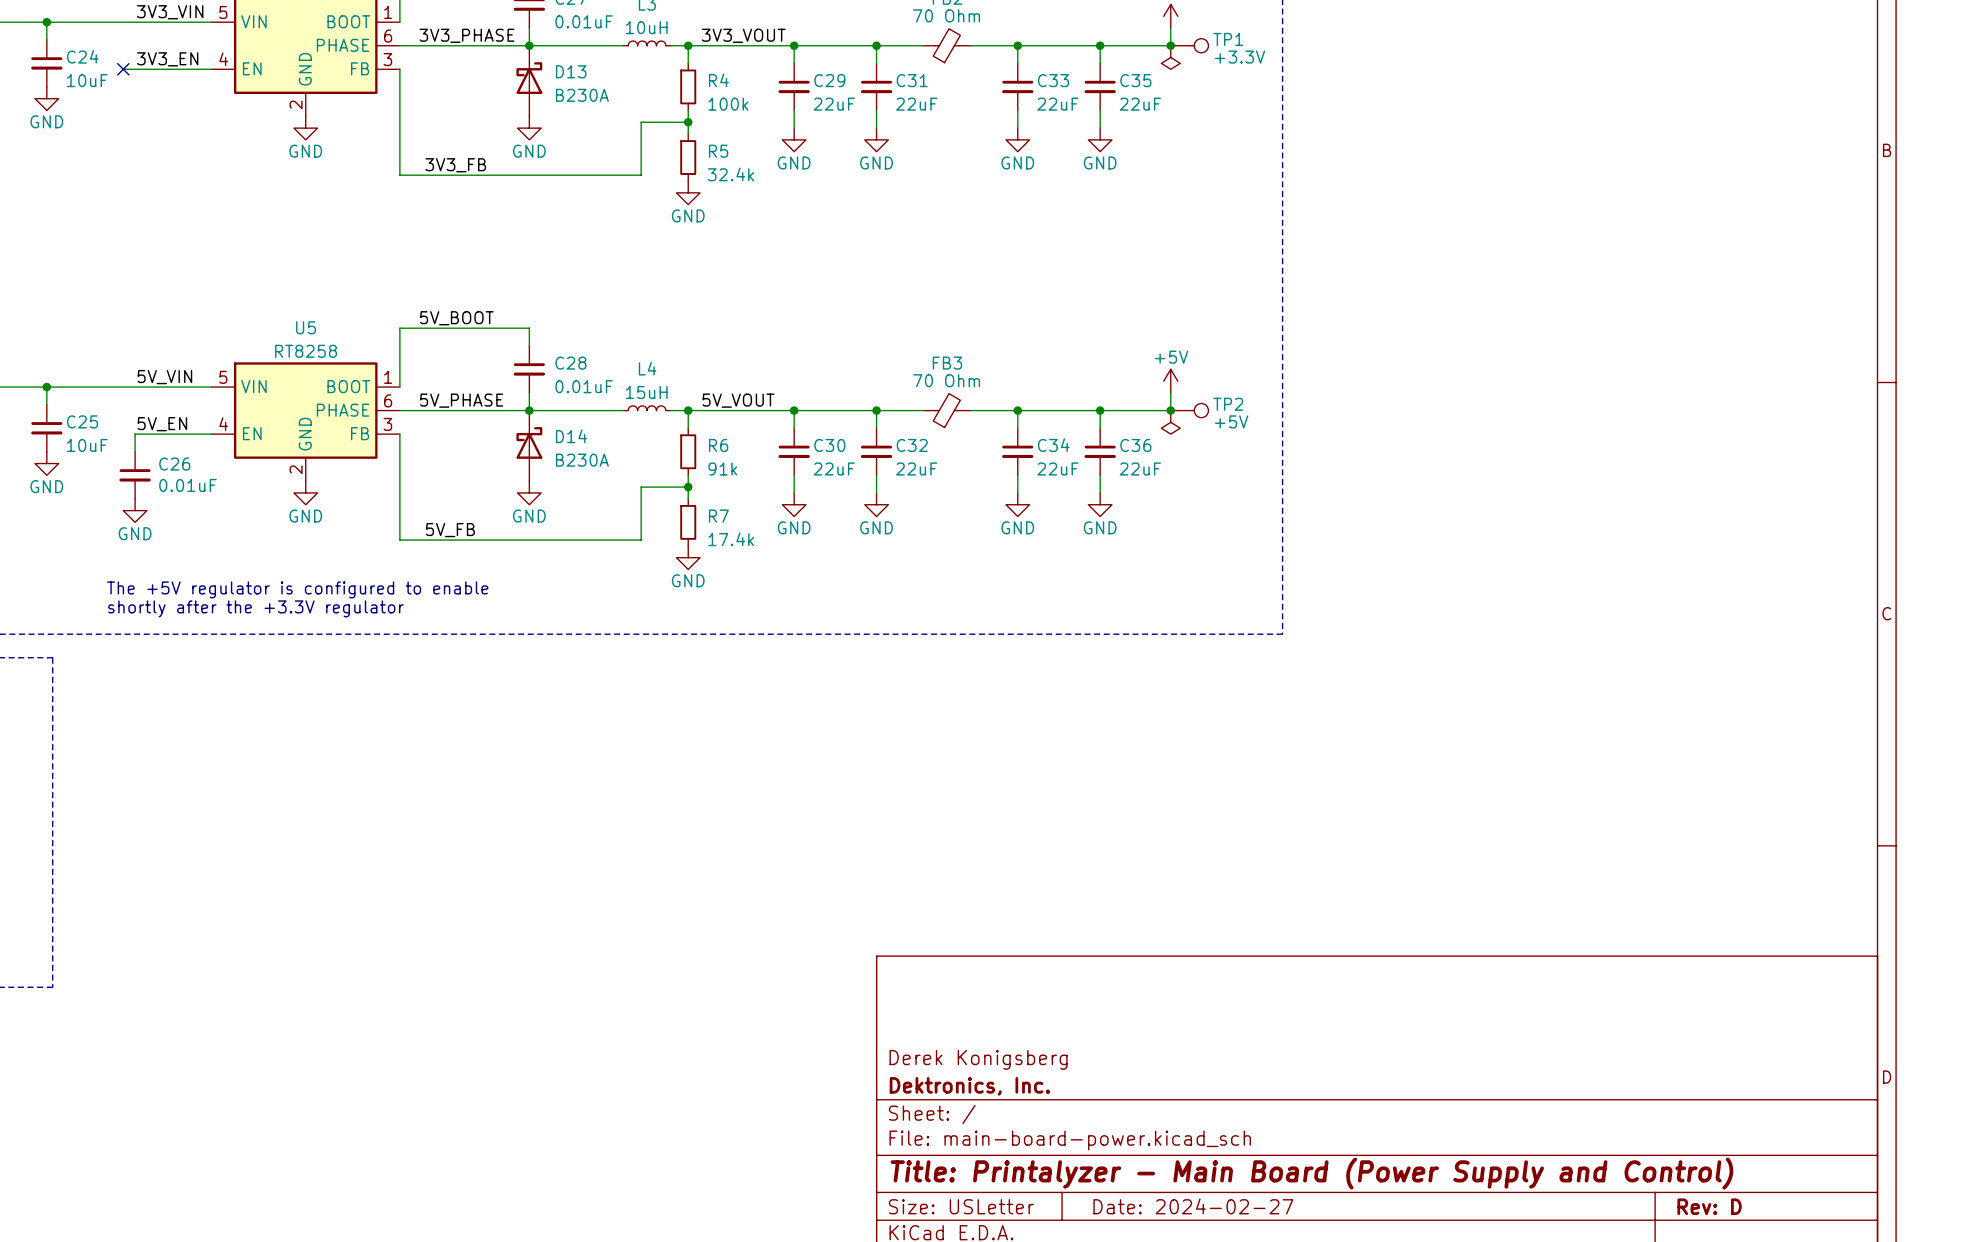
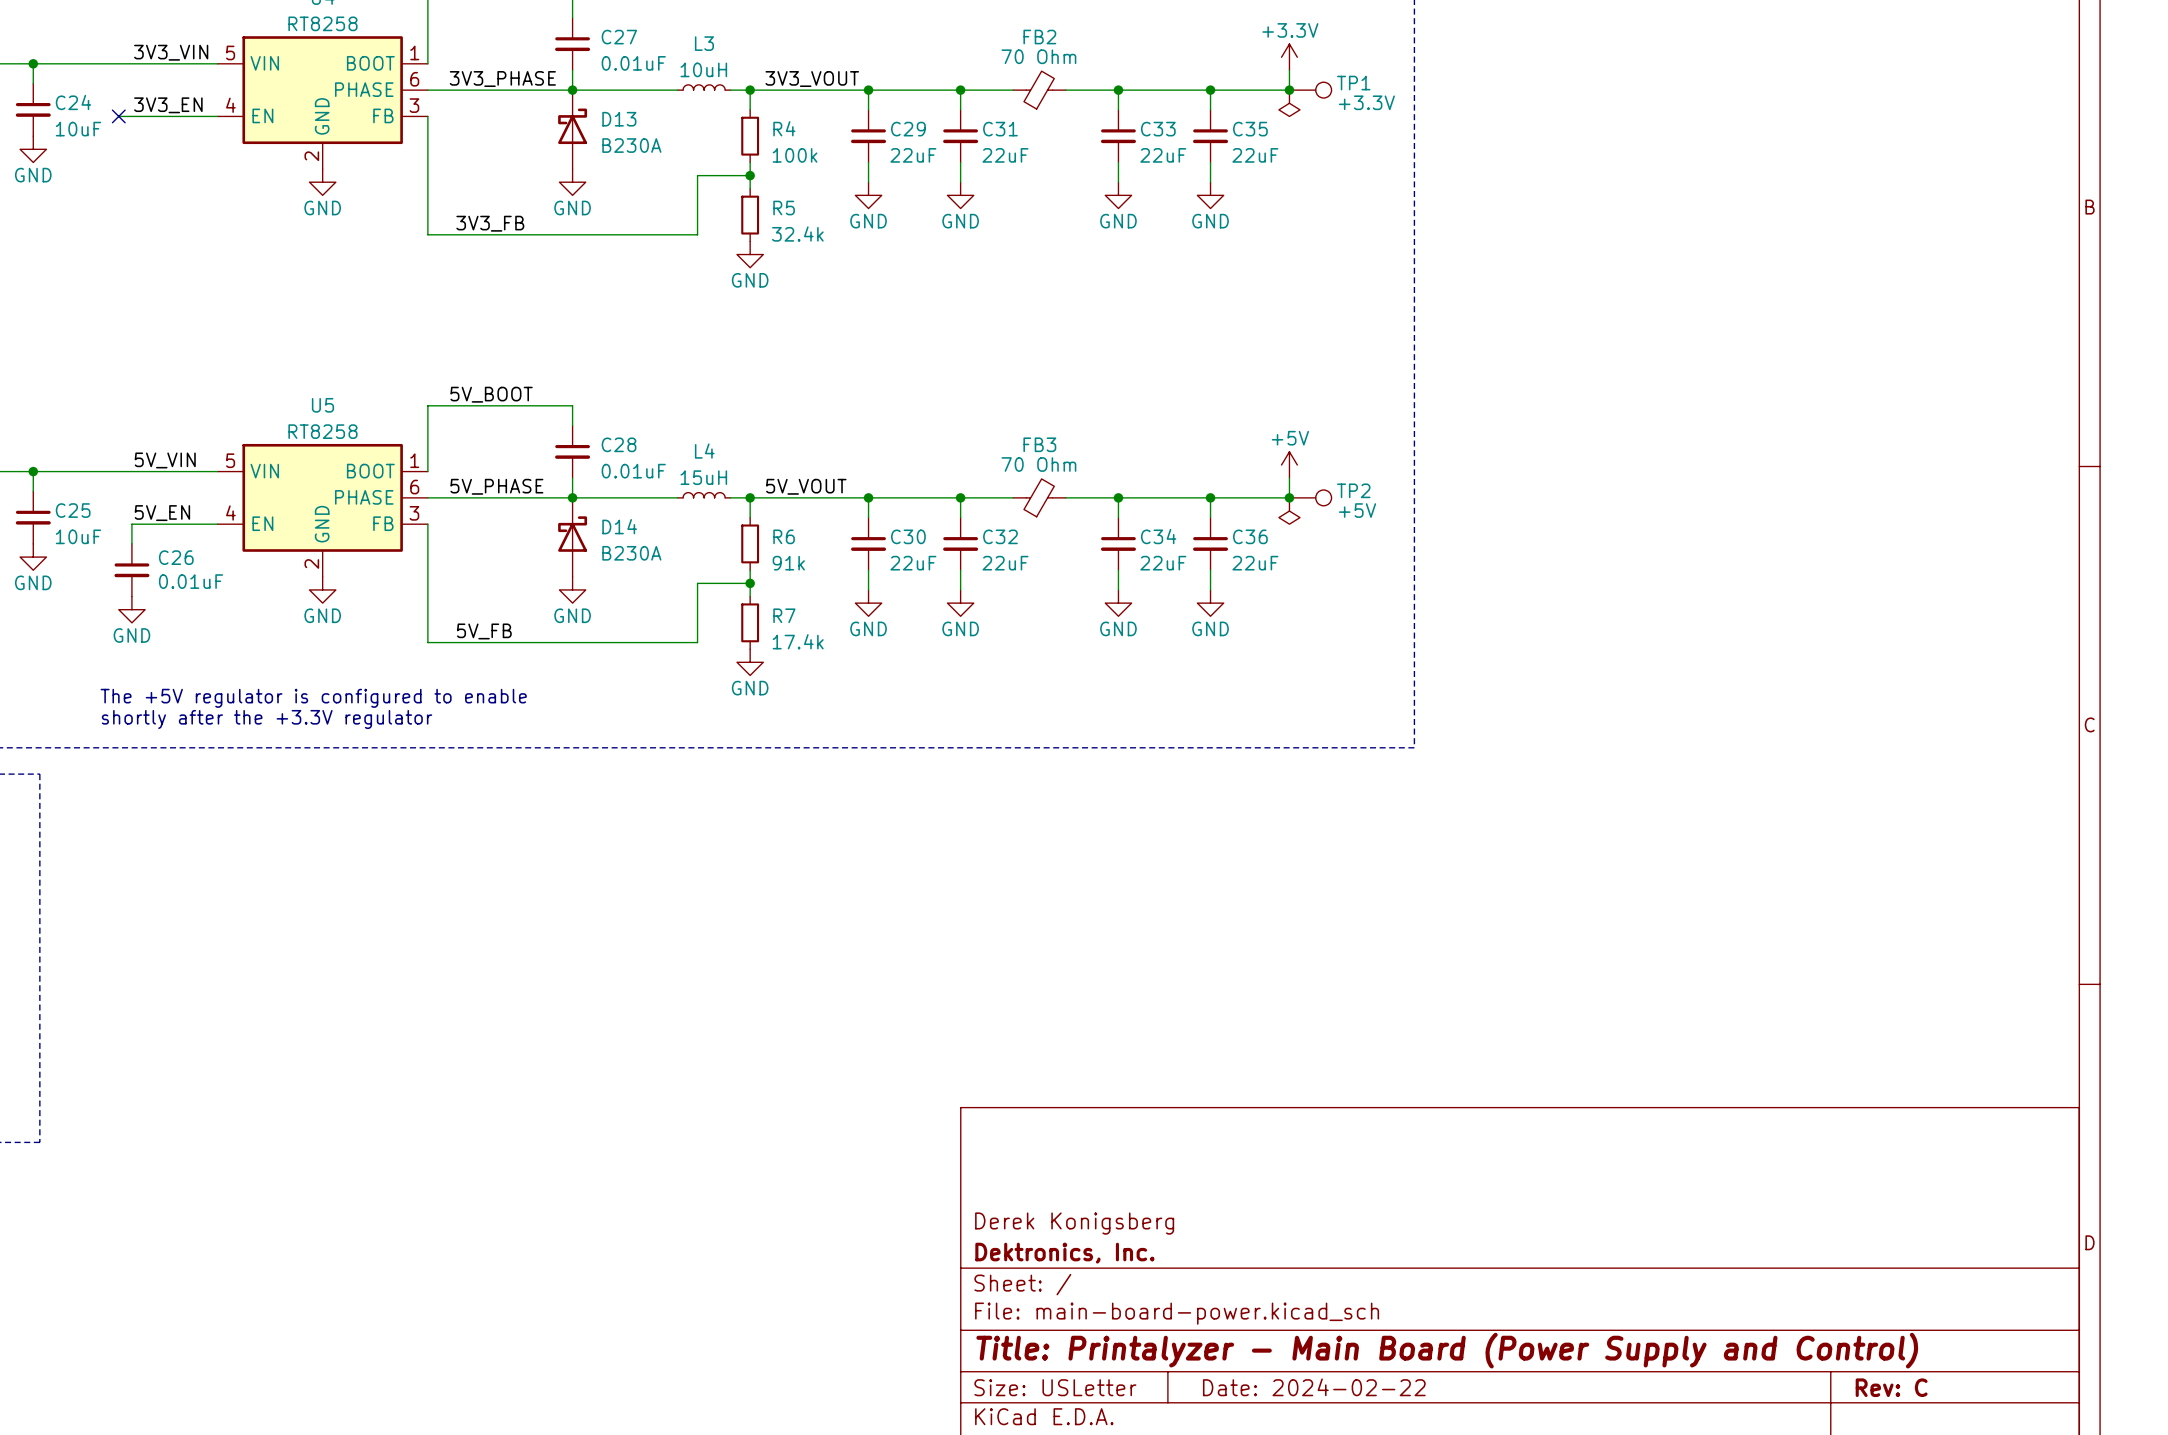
title block: Date: 2024-02-27 (1193, 1206) -> Date: 2024-02-22 (1314, 1387)
title block: Rev: D (1709, 1206) -> Rev: C (1891, 1387)

